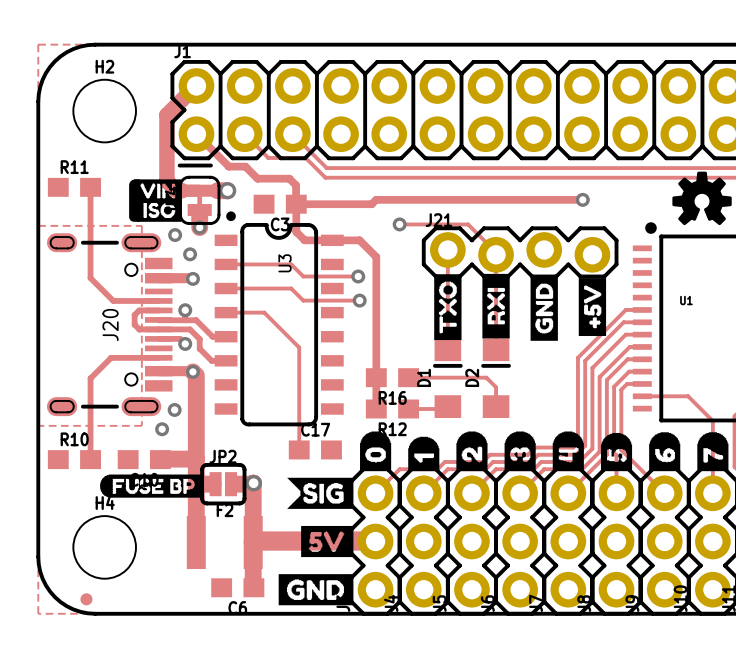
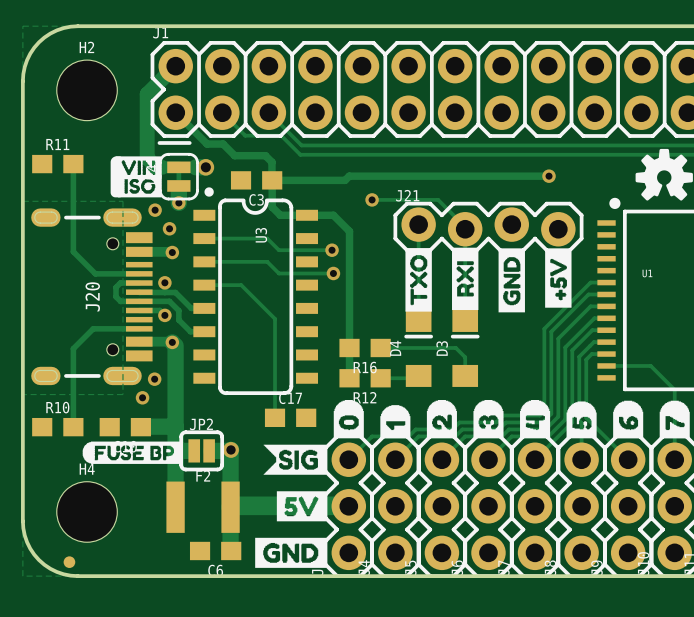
D1 name: D1 (424, 377) -> D4 (395, 348)
D2 name: D2 (472, 377) -> D3 (442, 348)

